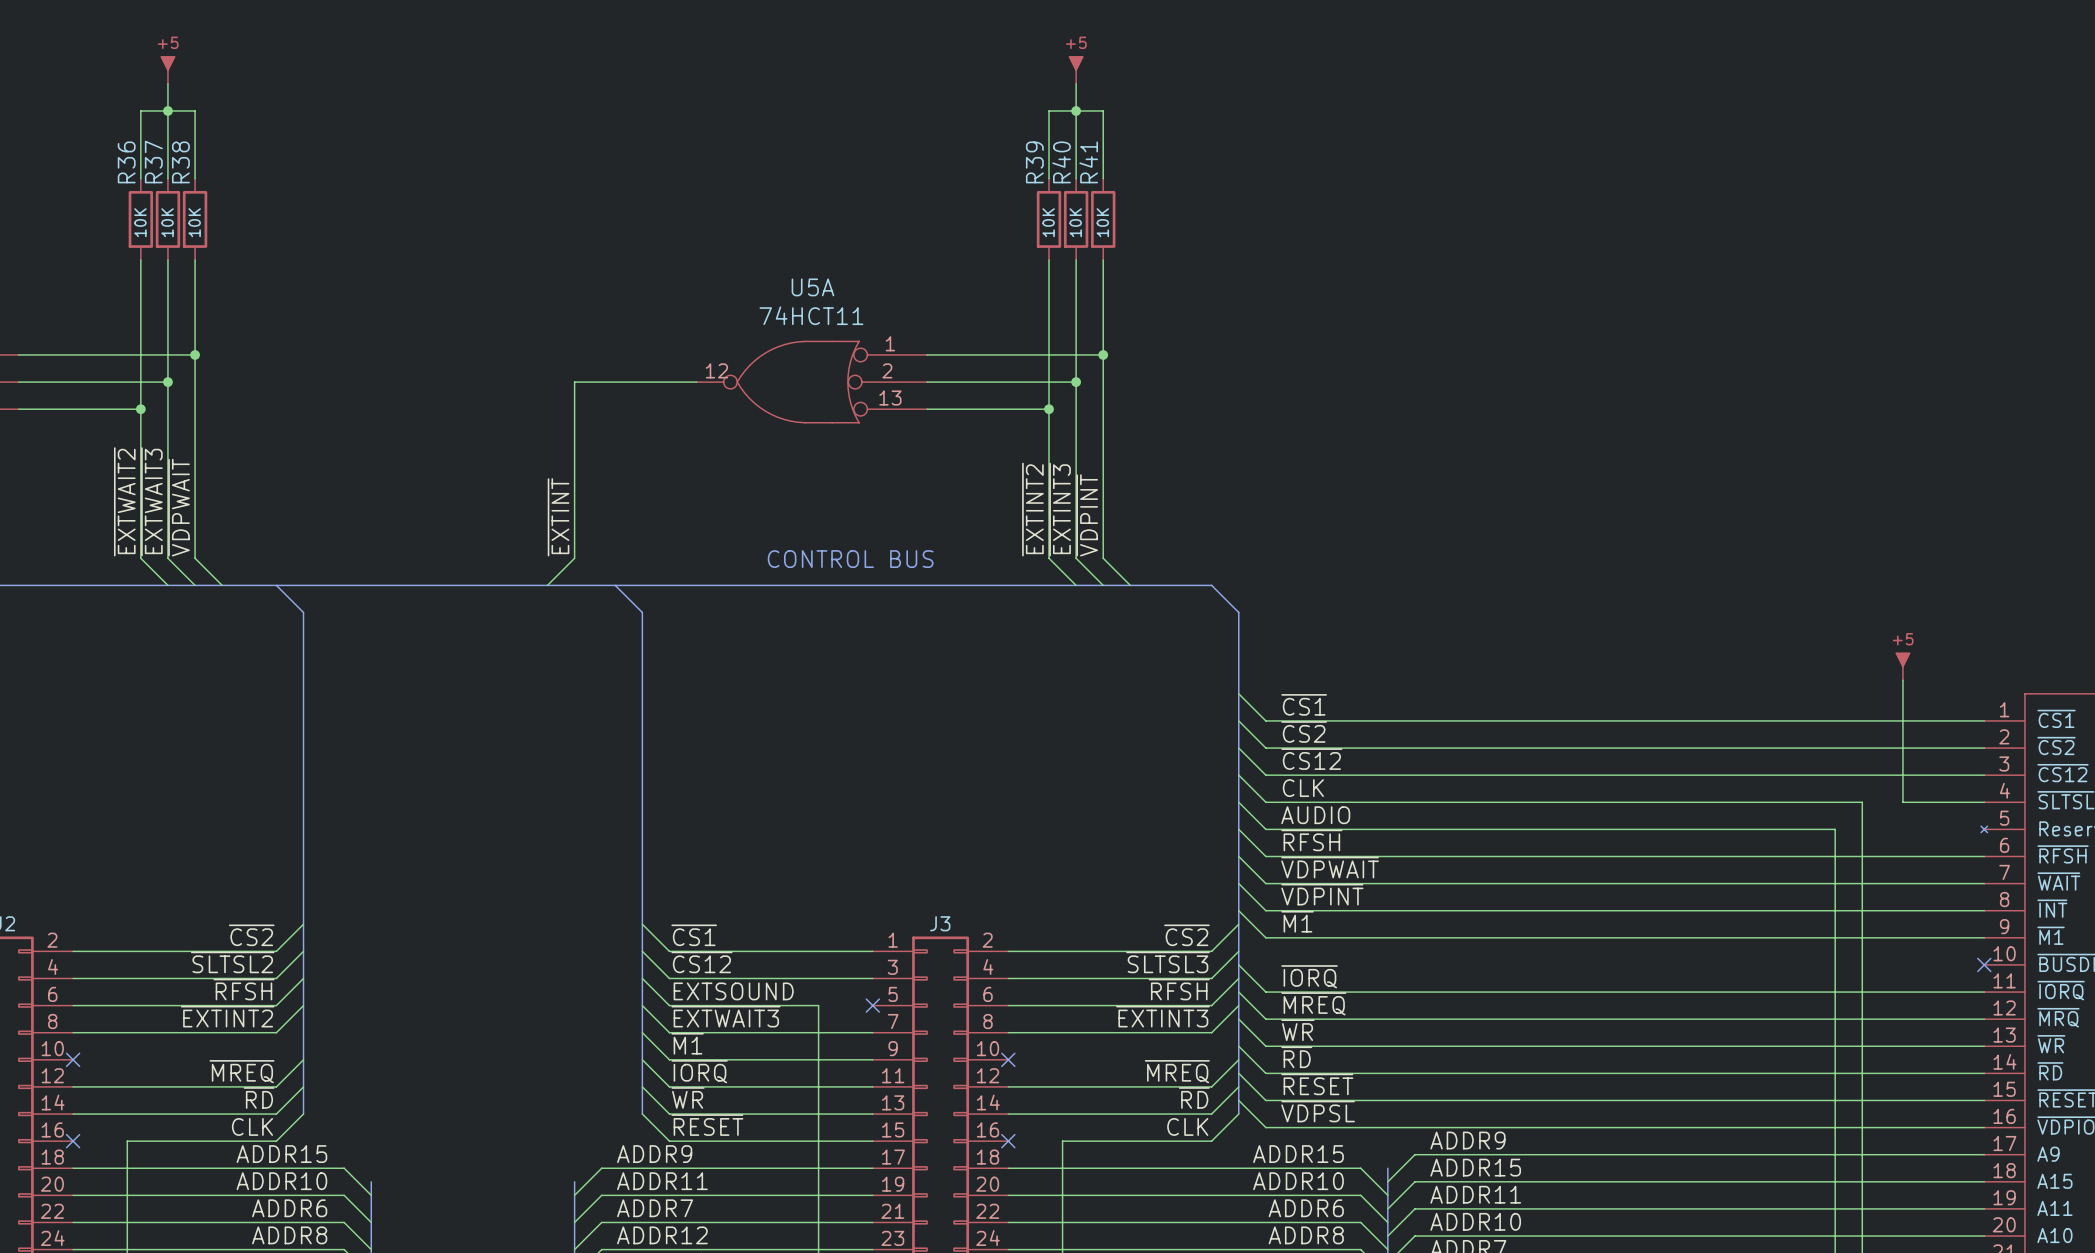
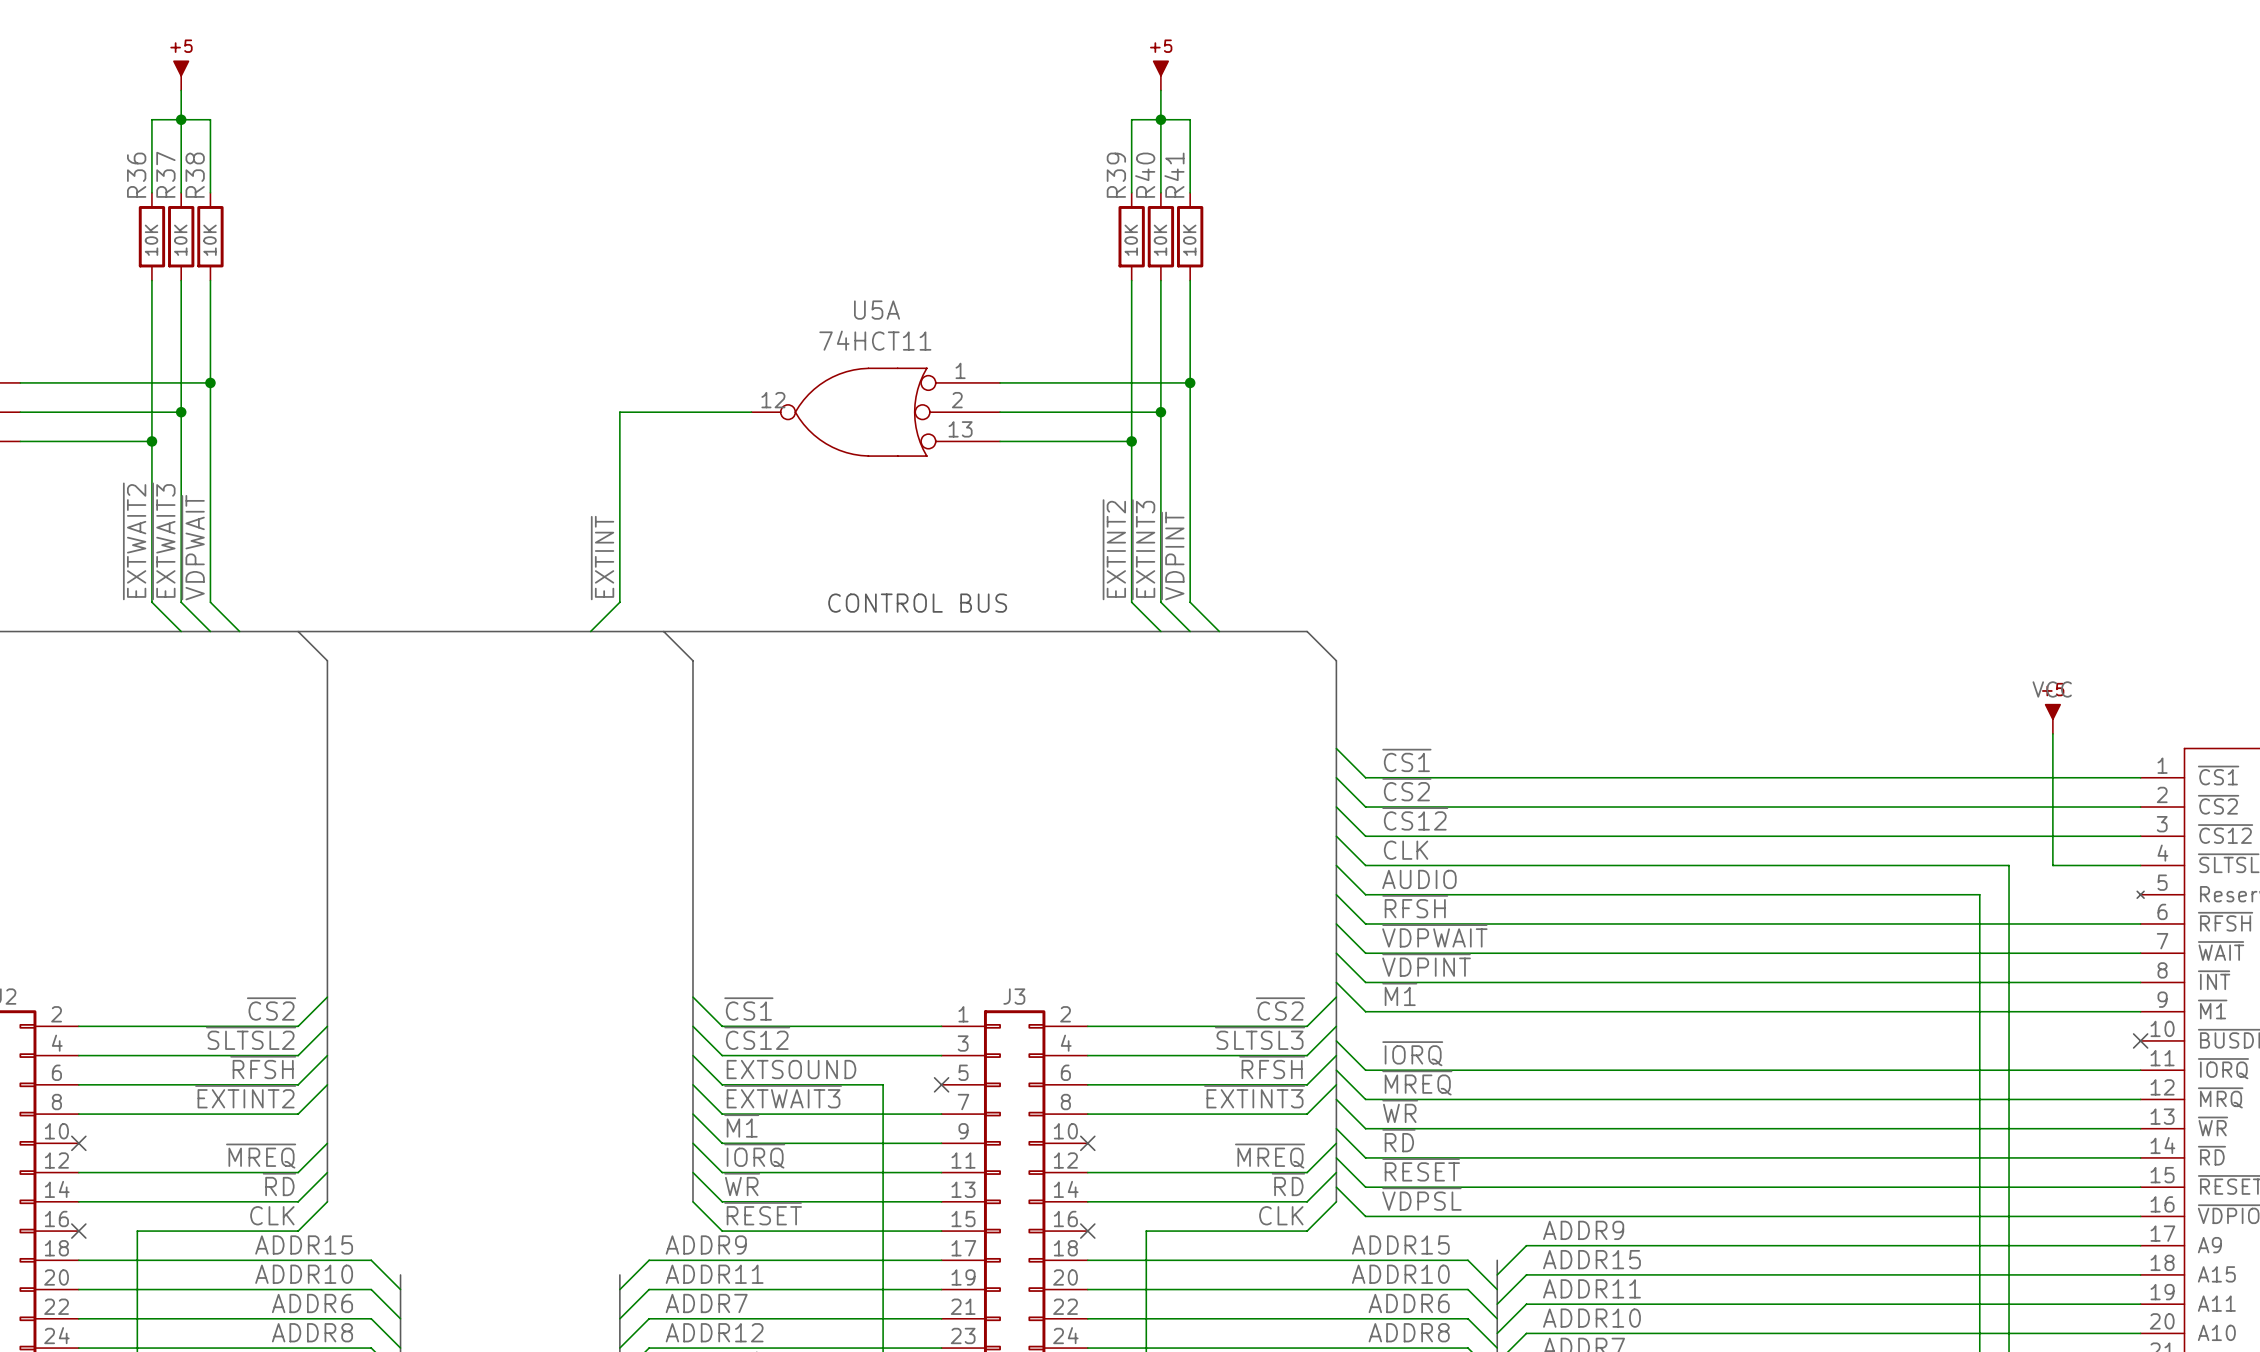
power symbol text: none -> VCC (2052, 689)

